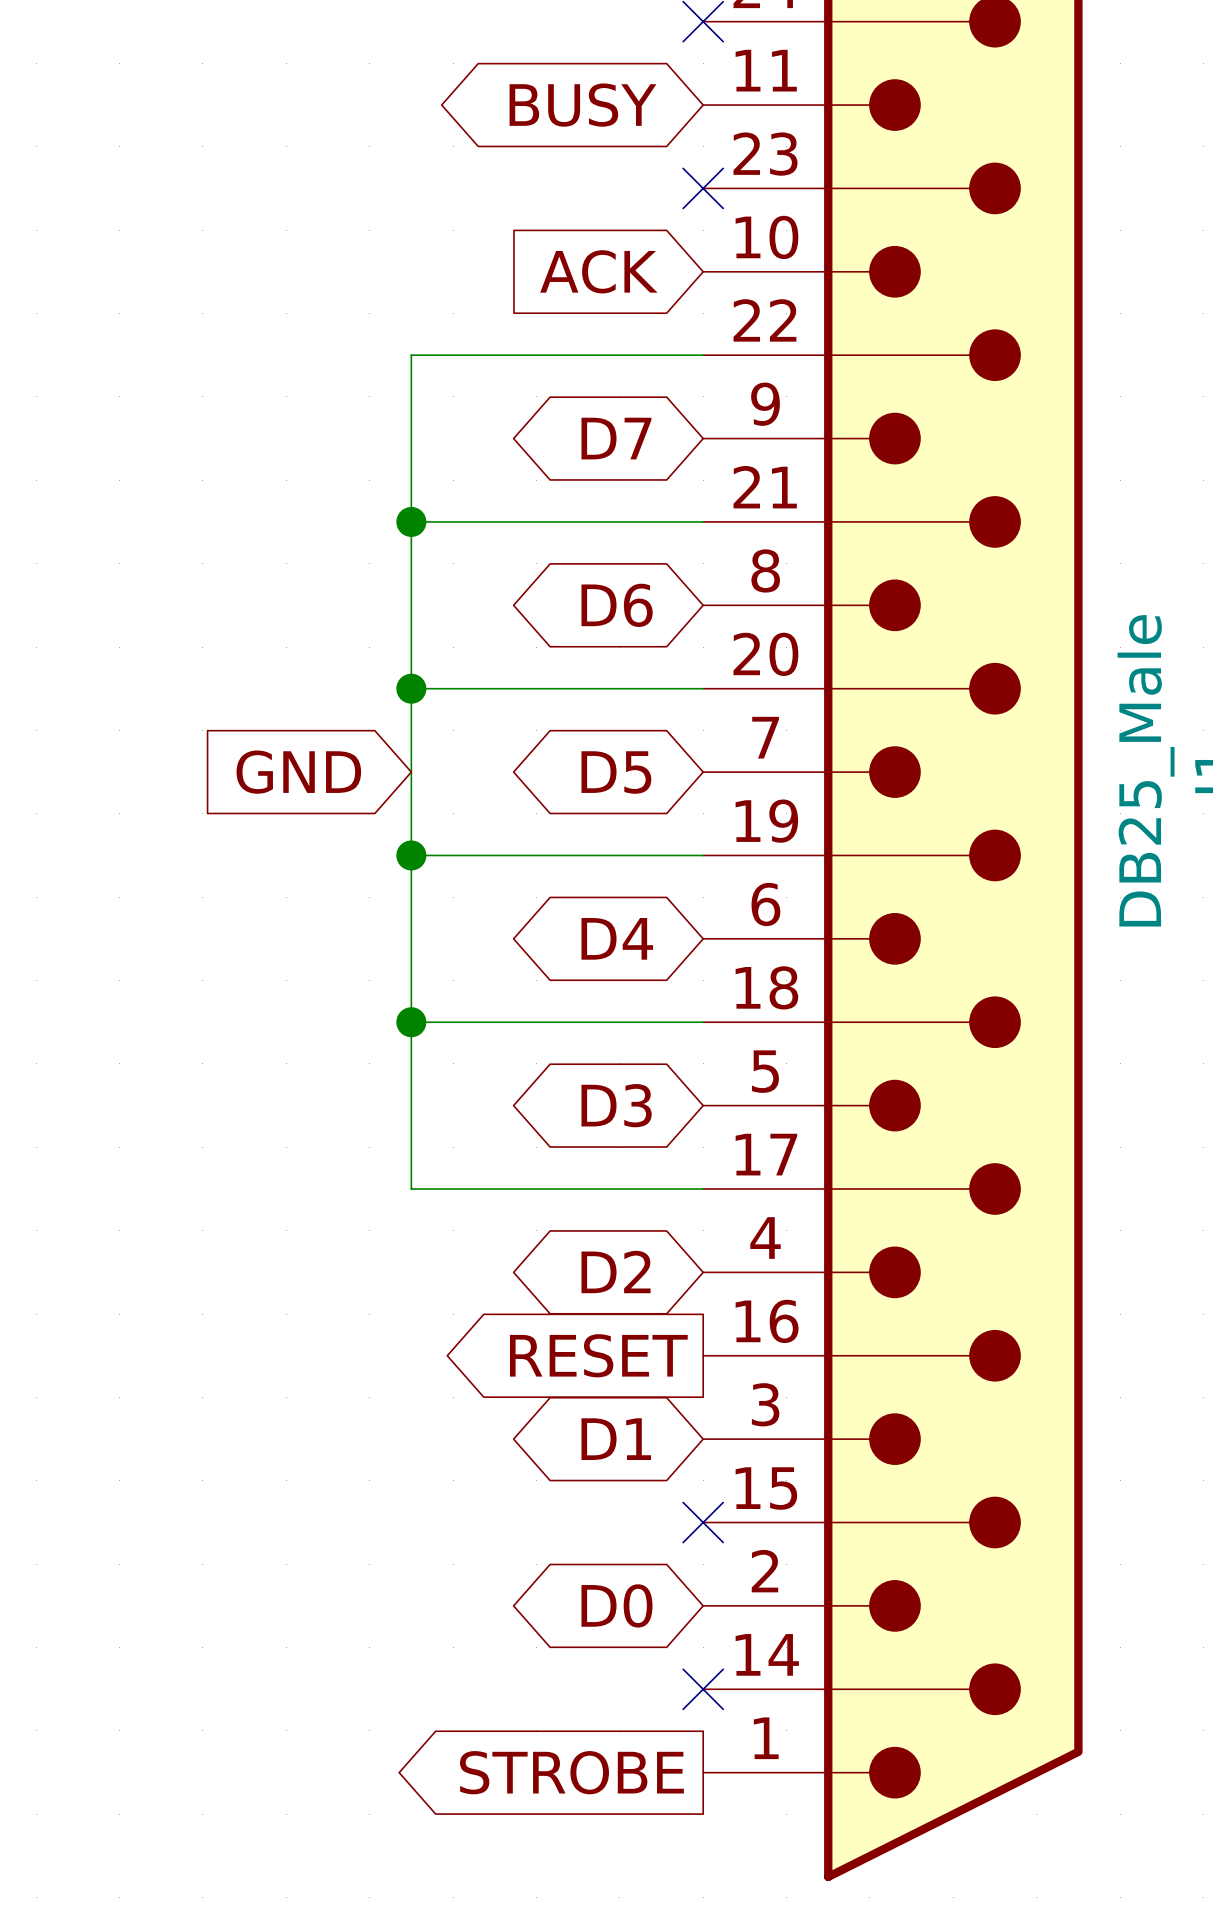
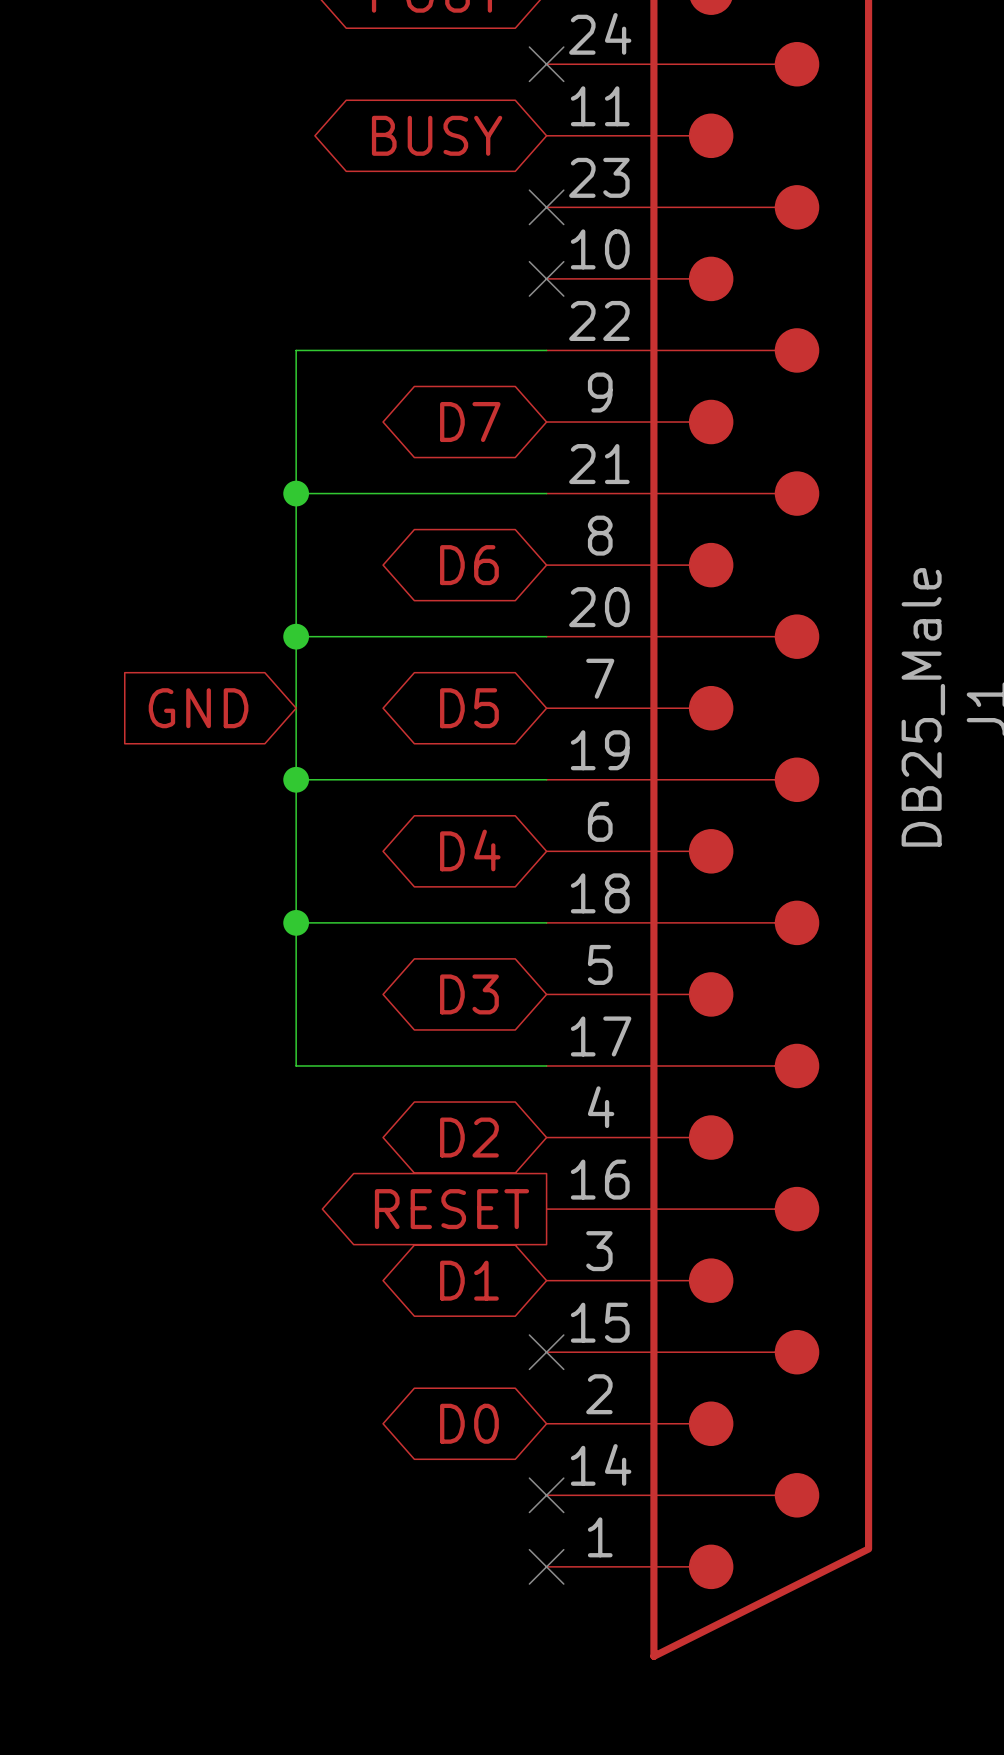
global label: ACK (598, 271) -> none
no-connect mark: none -> (546, 278)
global label: STROBE (571, 1772) -> none
no-connect mark: none -> (546, 1566)

